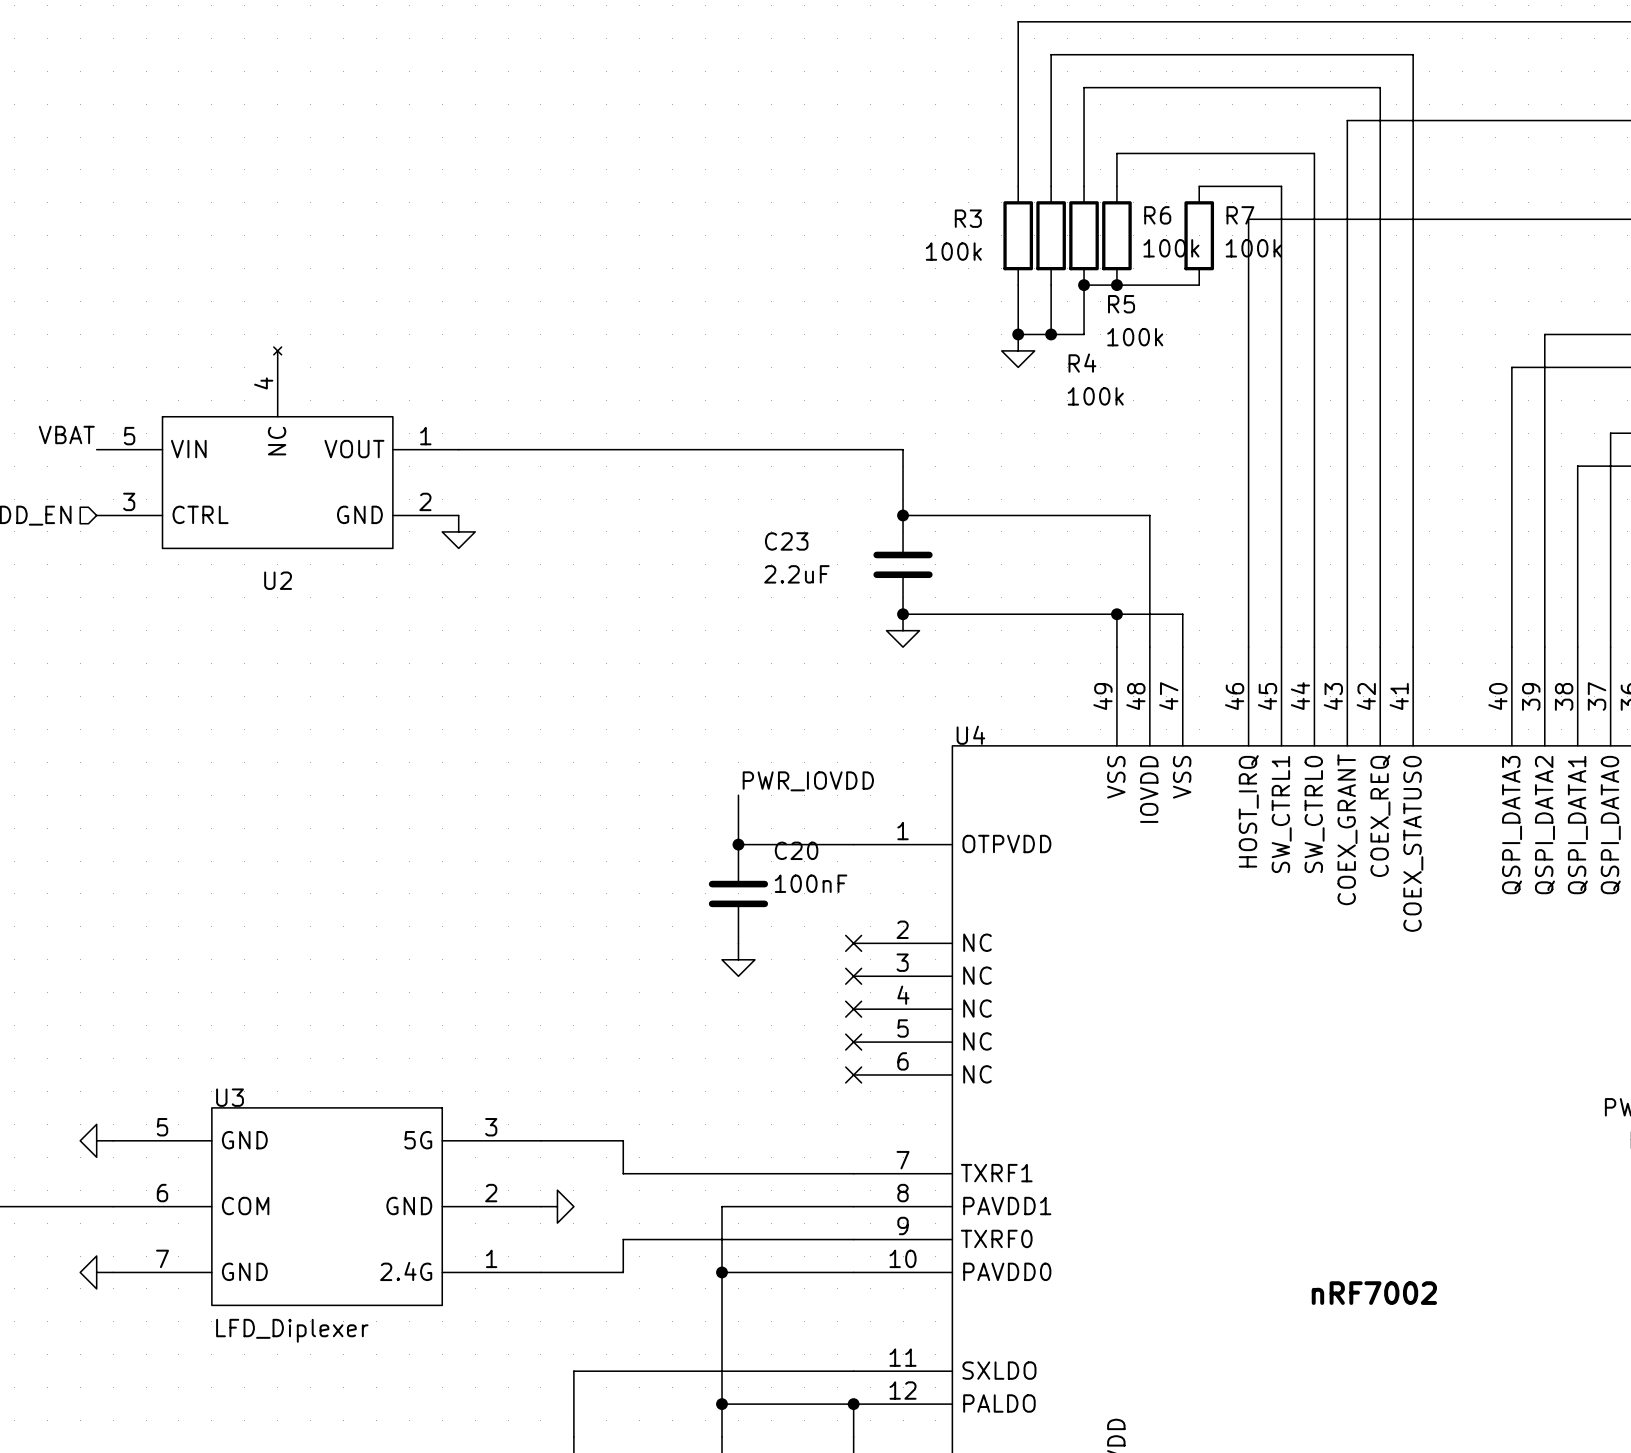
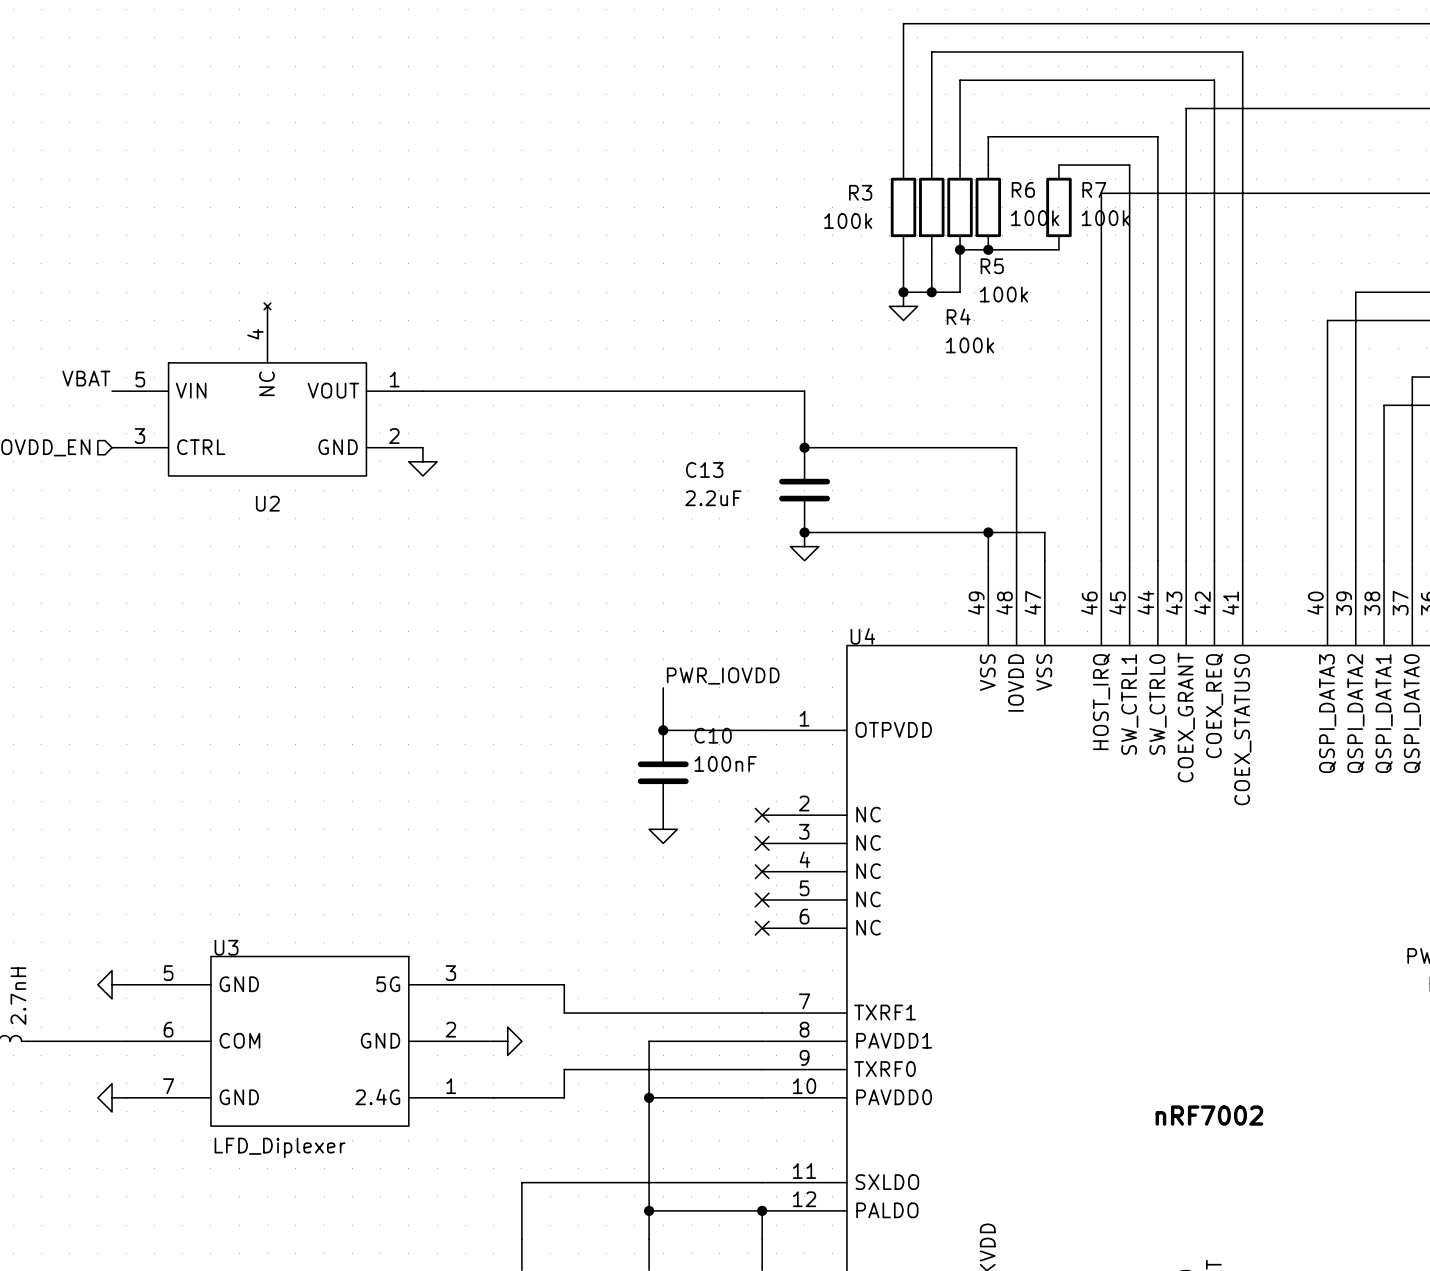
C23 name: C23 (786, 541) -> C13 (704, 469)
C20 name: C20 (796, 850) -> C10 (713, 735)

